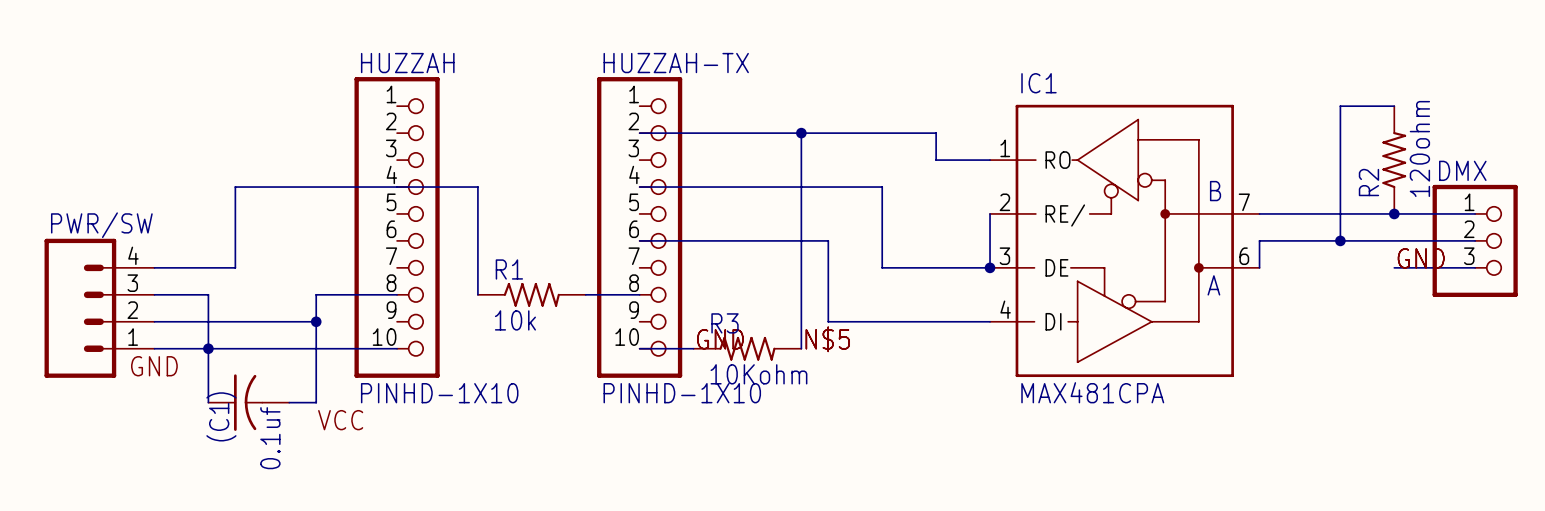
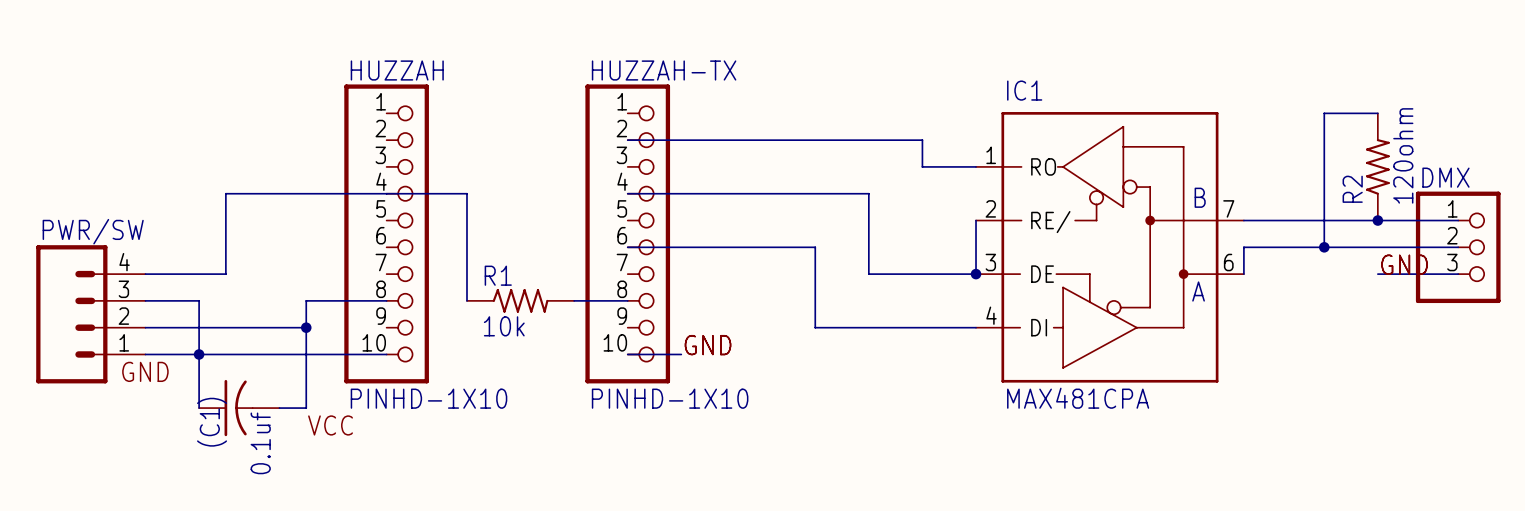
wire: (801, 133) (801, 348) -> none
junction: (801, 133) -> none
label: N$5 (827, 339) -> none
R3: 10Kohm (747, 348) -> none

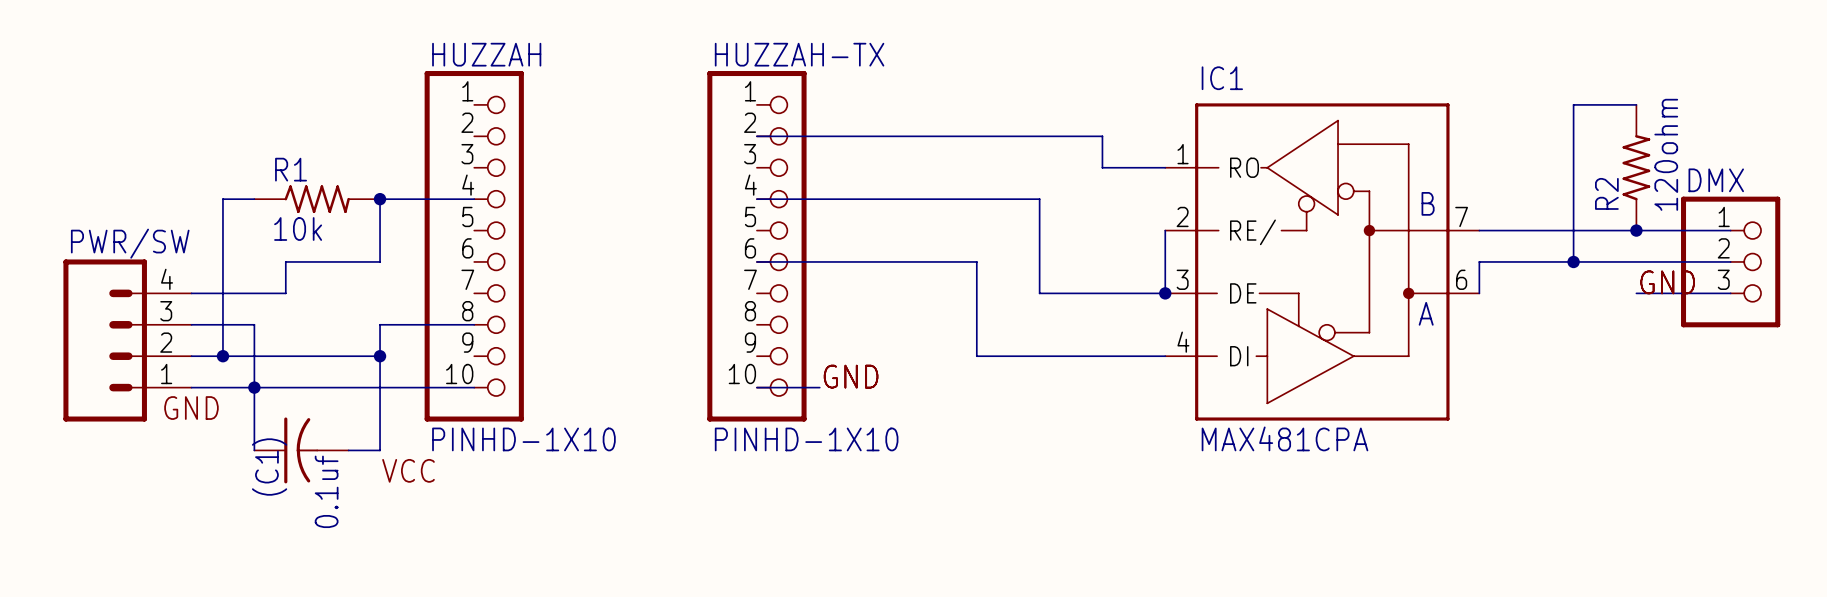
wire: none -> (254, 199) (222, 199) (222, 356)
wire: (306, 193) (225, 193) (225, 247) -> (380, 199) (380, 261) (285, 261)
junction: none -> (380, 199)
wire: (386, 193) (466, 193) (466, 300) -> none
R1 position: (520, 300) -> (317, 199)
wire: (574, 300) (627, 300) -> none
junction: none -> (222, 356)

